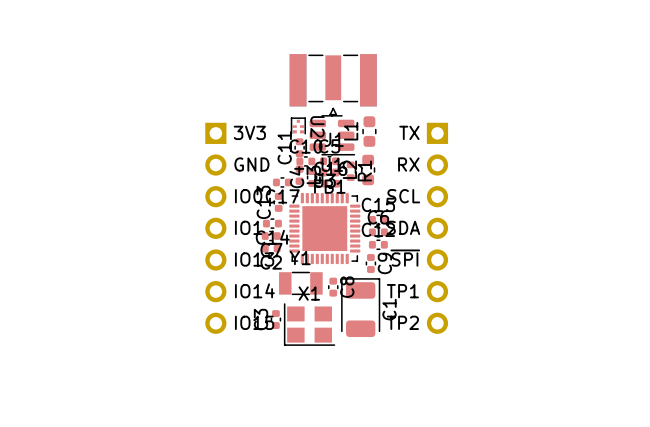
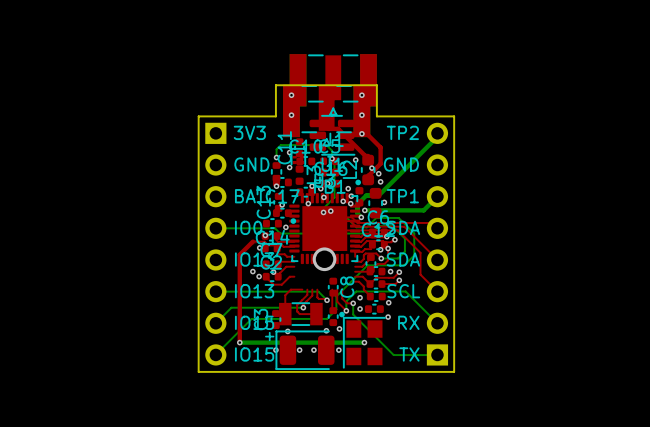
board edge: none -> (275, 85) (275, 116) (198, 116) (198, 371) (454, 371) (454, 116) (376, 116) (376, 85) (275, 85)
via: none -> (291, 95)
via: none -> (361, 95)
via: none -> (291, 115)
part: none -> (326, 115)
via: none -> (361, 115)
U2: (298, 125) -> none
top track: none -> (328, 128) (338, 128) (365, 155) (368, 155)
top track: none -> (363, 130) (380, 147) (380, 163) (368, 175)
L1: (369, 131) -> none
text: TX (409, 132) -> TP2 (402, 132)
via: none -> (361, 133)
bottom track: none -> (437, 133) (437, 136) (378, 195) (366, 195) (357, 204) (357, 213) (361, 217)
via: none -> (289, 152)
part: none -> (298, 156)
bottom track: none -> (276, 157) (276, 149) (280, 145) (326, 145) (332, 150) (332, 158) (334, 161) (334, 197) (323, 208) (323, 212)
via: none -> (276, 157)
via: none -> (332, 158)
via: none -> (355, 160)
text: RX (408, 164) -> GND (401, 164)
via: none -> (289, 167)
via: none -> (371, 168)
part: none -> (276, 171)
R1: (350, 171) -> none
via: none -> (378, 173)
C4: (312, 177) -> none
drawing: none -> [355, 179, 361, 186]
via: none -> (380, 181)
via: none -> (327, 183)
via: none -> (276, 186)
via: none -> (312, 186)
via: none -> (320, 188)
via: none -> (348, 188)
part: none -> (305, 192)
text: IO0 (248, 196) -> BAT (250, 196)
via: none -> (351, 196)
part: none -> (359, 196)
text: SCL (403, 196) -> TP1 (402, 196)
bottom track: none -> (437, 196) (423, 210) (364, 210)
via: none -> (323, 197)
via: none -> (343, 201)
via: none -> (384, 202)
via: none -> (308, 203)
via: none -> (350, 203)
part: none -> (375, 203)
via: none -> (282, 204)
via: none -> (364, 210)
bottom track: none -> (330, 211) (340, 211) (356, 227) (366, 227) (376, 217) (398, 217) (414, 233) (414, 255) (404, 265) (367, 265) (336, 296) (336, 309) (327, 318) (251, 318) (215, 355)
via: none -> (330, 211)
via: none -> (323, 212)
part: none -> (282, 213)
via: none -> (361, 217)
drawing: none -> [290, 218, 297, 224]
C15: (378, 219) -> none
text: IO1 (248, 227) -> IO0 (248, 227)
via: none -> (285, 227)
bottom track: none -> (215, 228) (275, 228) (280, 233) (371, 233) (378, 226) (392, 226) (404, 238) (404, 251) (398, 258) (381, 258)
part: (215, 228) -> none
top track: none -> (342, 228) (342, 223) (344, 221) (350, 221) (356, 226) (404, 226) (437, 259)
top track: none -> (437, 228) (432, 222) (357, 222) (351, 217) (343, 217) (337, 223) (337, 228)
part: (437, 228) -> none
top track: none -> (346, 230) (398, 230) (420, 252) (420, 274) (437, 291)
via: none -> (265, 235)
top track: none -> (355, 236) (361, 236) (364, 233) (384, 233) (386, 236) (365, 237) (361, 241) (355, 241)
via: none -> (386, 236)
top track: none -> (275, 239) (277, 241) (294, 241)
top track: none -> (394, 239) (391, 242) (366, 241) (361, 246) (355, 246)
via: none -> (394, 239)
top track: none -> (252, 241) (264, 241) (268, 245) (294, 246)
top track: none -> (252, 241) (239, 254) (239, 342)
part: none -> (215, 244)
part: none -> (437, 244)
via: none -> (259, 247)
top track: none -> (388, 248) (388, 260) (384, 264) (377, 264) (369, 271) (355, 271)
via: none -> (388, 248)
top track: none -> (371, 249) (355, 251) (355, 256)
via: none -> (380, 249)
top track: none -> (278, 254) (294, 256)
top track: none -> (381, 258) (376, 253) (365, 253) (361, 261) (355, 261)
via: none -> (381, 258)
text: ~{SPI} (405, 258) -> SDA (403, 259)
via: none -> (324, 259)
top track: none -> (370, 259) (362, 266) (355, 266)
top track: none -> (294, 261) (277, 262)
C9 name: C9 (384, 263) -> none
part: none -> (272, 264)
top track: none -> (294, 266) (286, 266) (279, 274)
via: none -> (252, 271)
part: none -> (376, 271)
via: none -> (390, 271)
via: none -> (273, 272)
top track: none -> (399, 272) (393, 277) (376, 277) (370, 284) (362, 276) (355, 276)
via: none -> (399, 272)
via: none -> (259, 276)
part: none -> (272, 276)
top track: none -> (294, 276) (289, 276) (281, 284) (273, 284) (265, 277)
top track: none -> (399, 280) (395, 284) (381, 284)
via: none -> (399, 280)
top track: none -> (355, 281) (358, 281) (370, 296)
Y1: (300, 283) -> none
part: none -> (376, 284)
top track: none -> (302, 289) (290, 289) (285, 295) (285, 313)
top track: none -> (307, 289) (307, 295) (297, 305) (297, 311) (299, 314) (316, 314)
top track: none -> (312, 289) (312, 295) (303, 304) (303, 307)
top track: none -> (317, 289) (317, 297) (327, 300)
top track: none -> (332, 289) (332, 310)
top track: none -> (337, 289) (337, 301) (346, 310)
top track: none -> (342, 289) (342, 298) (346, 303) (353, 303)
text: IO14 (254, 290) -> IO13 (254, 291)
bottom track: none -> (215, 291) (318, 291) (327, 300)
text: TP1 (402, 291) -> SCL (403, 291)
part: none -> (376, 296)
via: none -> (360, 297)
via: none -> (327, 300)
via: none -> (388, 302)
bottom track: none -> (353, 303) (353, 314) (393, 355) (437, 355)
via: none -> (353, 303)
bottom track: none -> (303, 307) (231, 307) (215, 323)
via: none -> (303, 307)
C1: (360, 307) -> none
via: none -> (360, 308)
part: none -> (374, 309)
bottom track: none -> (346, 310) (346, 301) (356, 291) (405, 291) (437, 323)
via: none -> (346, 310)
drawing: none -> [339, 311, 345, 318]
part: none -> (300, 314)
part: none -> (333, 316)
via: none -> (388, 317)
text: TP2 (402, 322) -> RX (408, 322)
X1: (309, 324) -> none
via: none -> (339, 328)
via: none -> (326, 330)
via: none -> (287, 331)
text: none -> + (269, 336)
bottom track: none -> (239, 342) (364, 342)
via: none -> (239, 342)
part: none -> (364, 342)
via: none -> (364, 342)
via: none -> (275, 350)
via: none -> (299, 350)
part: none -> (305, 350)
via: none -> (313, 350)
via: none -> (338, 350)
text: none -> IO15 (254, 354)
text: none -> TX (409, 354)

